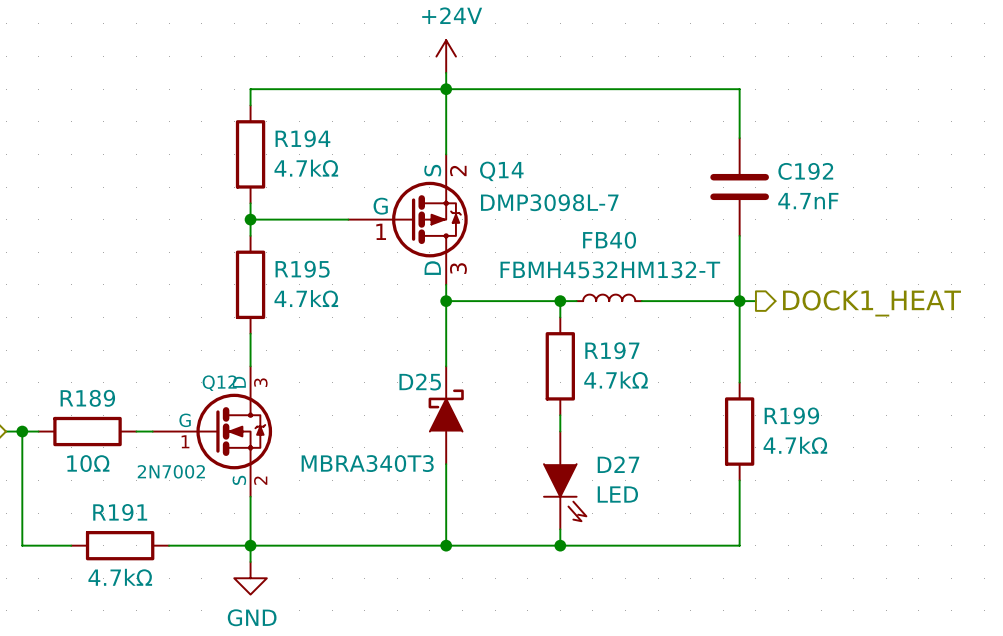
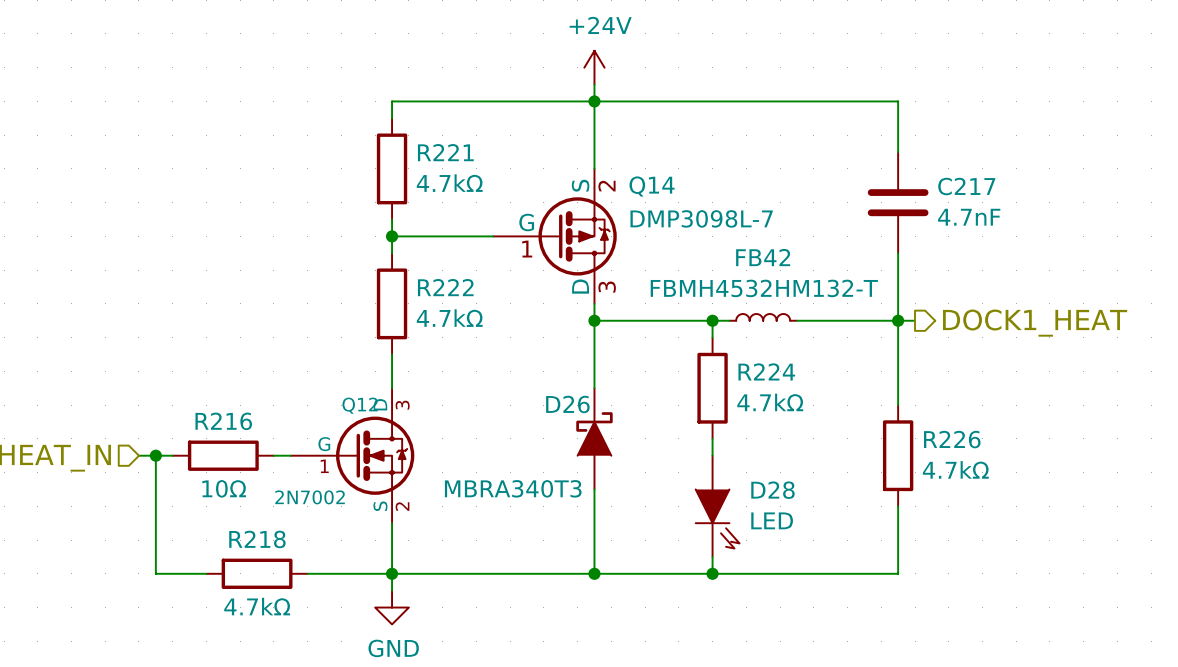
R194 name: R194 (302, 138) -> R221 (445, 152)
C192 name: C192 (805, 171) -> C217 (966, 186)
FB40 name: FB40 (609, 240) -> FB42 (763, 257)
R195 name: R195 (302, 269) -> R222 (445, 287)
R197 name: R197 (612, 350) -> R224 (766, 371)
D25 name: D25 (420, 382) -> D26 (567, 404)
R189 name: R189 (87, 398) -> R216 (223, 421)
R199 name: R199 (791, 415) -> R226 (952, 439)
D27 name: D27 (618, 464) -> D28 (772, 490)
R191 name: R191 (120, 512) -> R218 (257, 539)

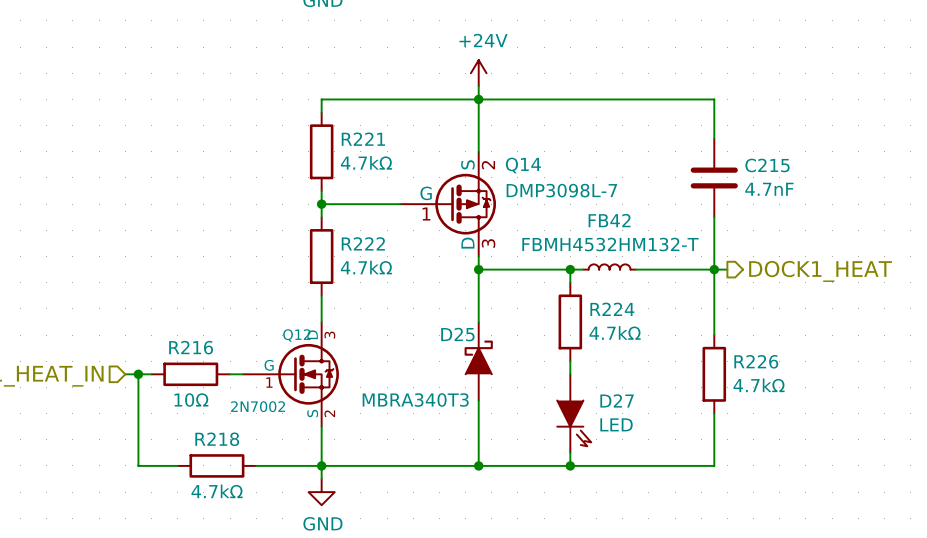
C217 name: C217 (966, 186) -> C215 (767, 165)
D26 name: D26 (567, 404) -> D25 (457, 334)
D28 name: D28 (772, 490) -> D27 (617, 400)

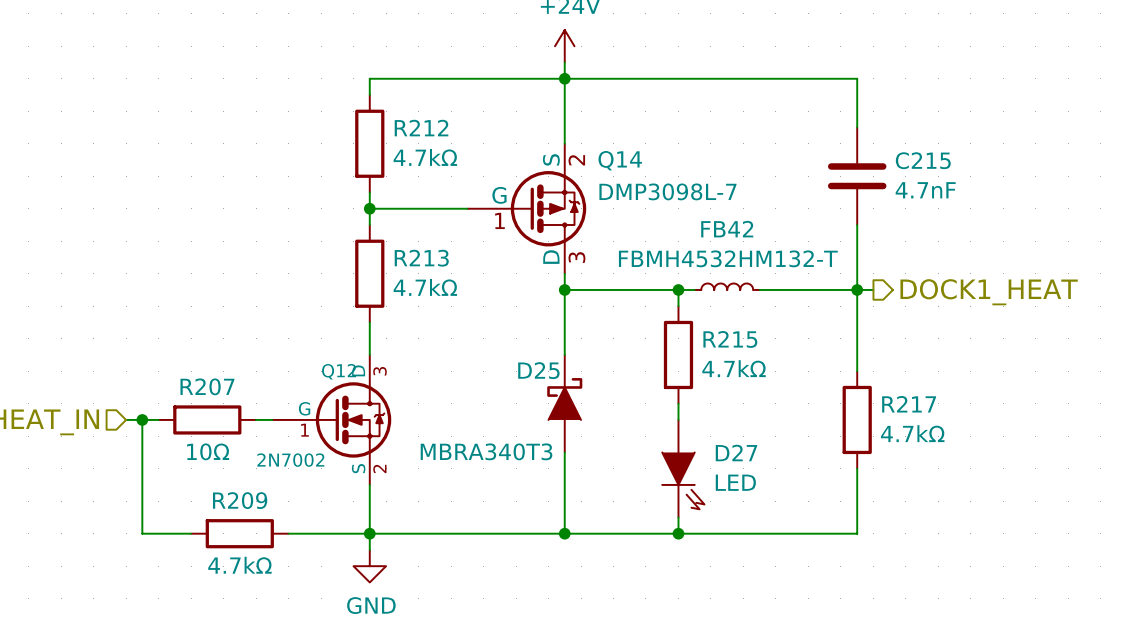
R221 name: R221 (363, 139) -> R212 (421, 128)
R222 name: R222 (363, 243) -> R213 (421, 258)
R224 name: R224 (612, 309) -> R215 (730, 339)
R216 name: R216 (191, 347) -> R207 (207, 386)
R226 name: R226 (756, 361) -> R217 (909, 404)
R218 name: R218 (217, 439) -> R209 (240, 500)

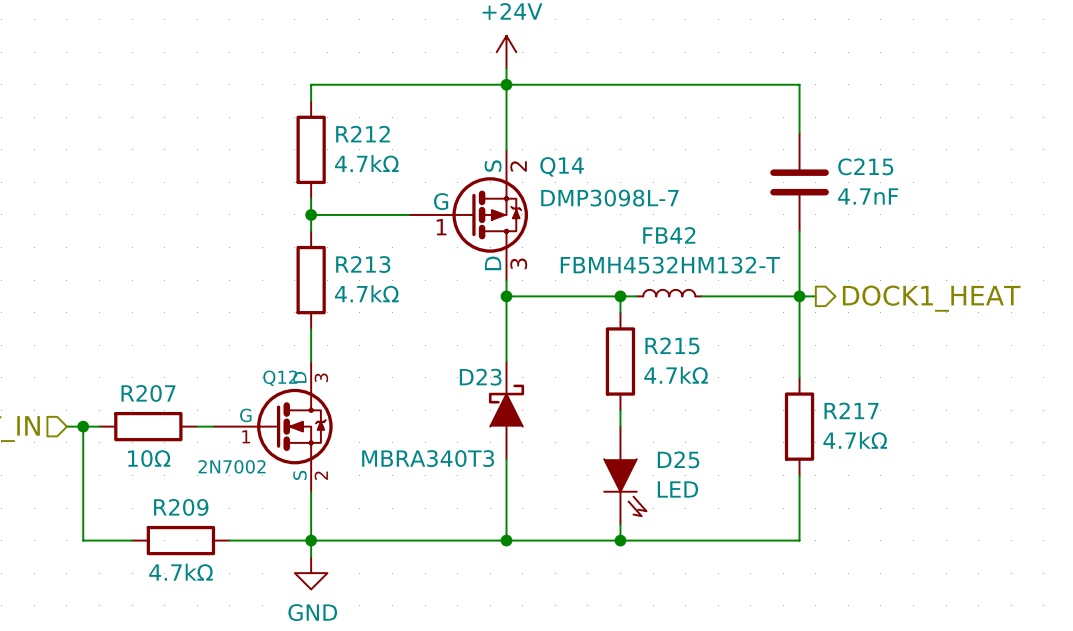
D25 name: D25 (538, 370) -> D23 (480, 377)
D27 name: D27 (736, 453) -> D25 (678, 459)

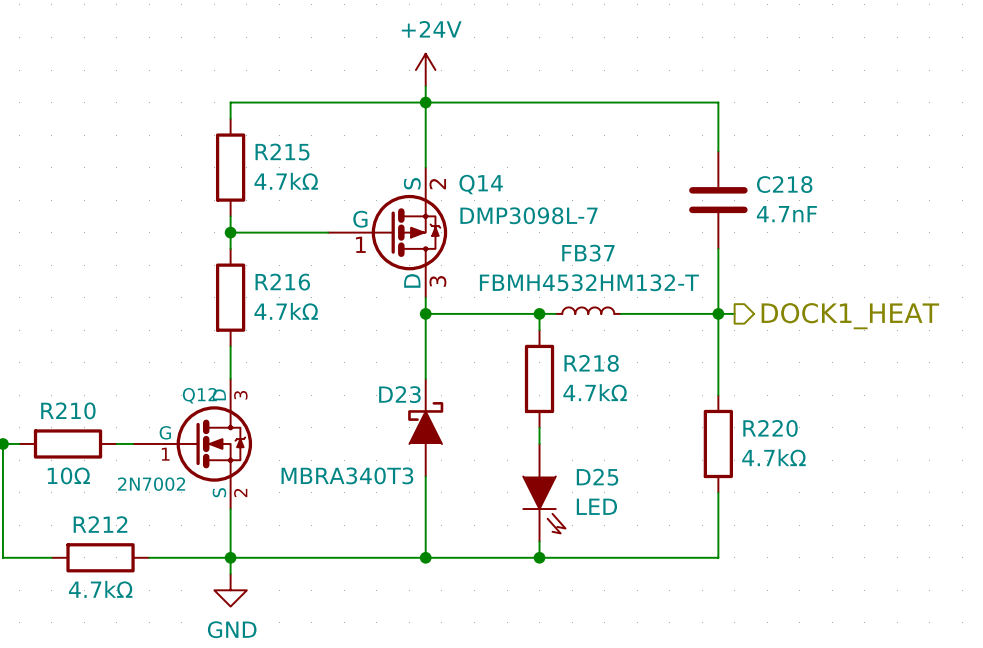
R212 name: R212 (362, 134) -> R215 (282, 152)
C215 name: C215 (865, 166) -> C218 (784, 184)
FB42 name: FB42 (669, 235) -> FB37 (588, 253)
R213 name: R213 (363, 264) -> R216 (282, 282)
R215 name: R215 (672, 345) -> R218 (591, 363)
R207 name: R207 (148, 393) -> R210 (68, 410)
R217 name: R217 (851, 410) -> R220 (770, 428)
R209 name: R209 (181, 507) -> R212 (100, 524)

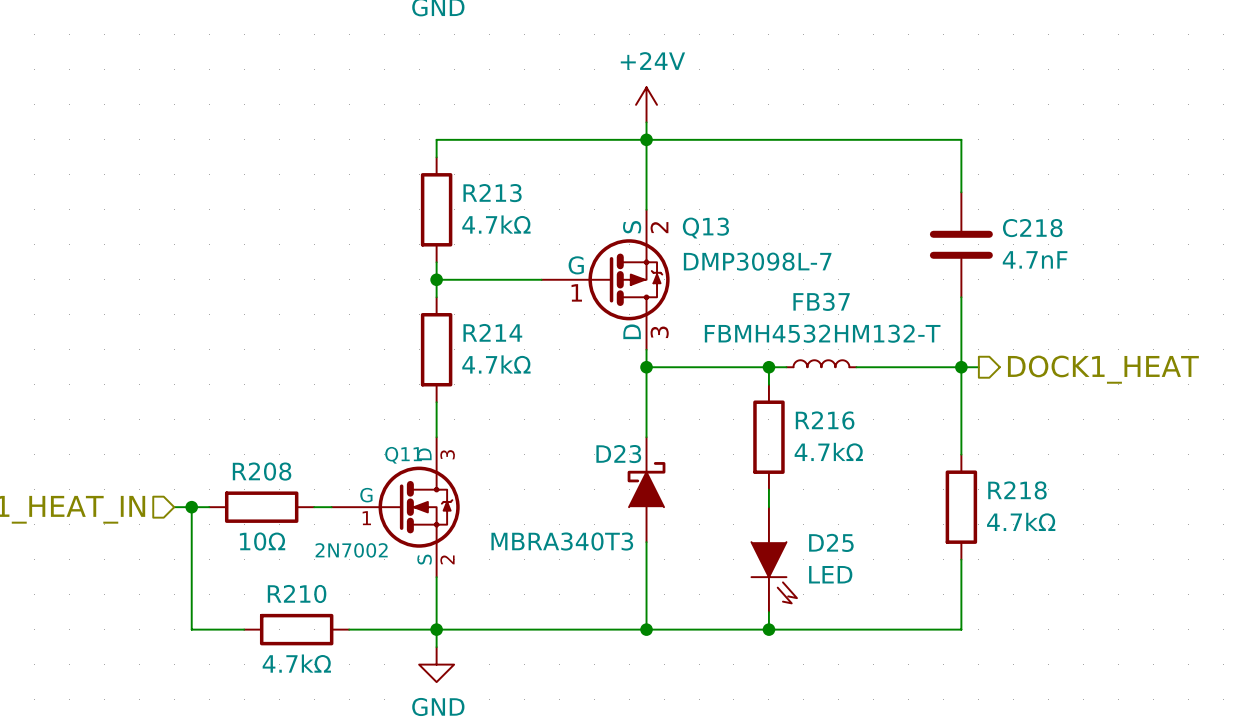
R215 name: R215 (282, 152) -> R213 (492, 193)
Q14 name: Q14 (481, 184) -> Q13 (705, 228)
R216 name: R216 (282, 282) -> R214 (492, 332)
R218 name: R218 (591, 363) -> R216 (825, 420)
Q12 name: Q12 (199, 395) -> Q11 (403, 455)
R210 name: R210 (68, 410) -> R208 (262, 471)
R220 name: R220 (770, 428) -> R218 (1017, 490)
R212 name: R212 (100, 524) -> R210 (297, 593)

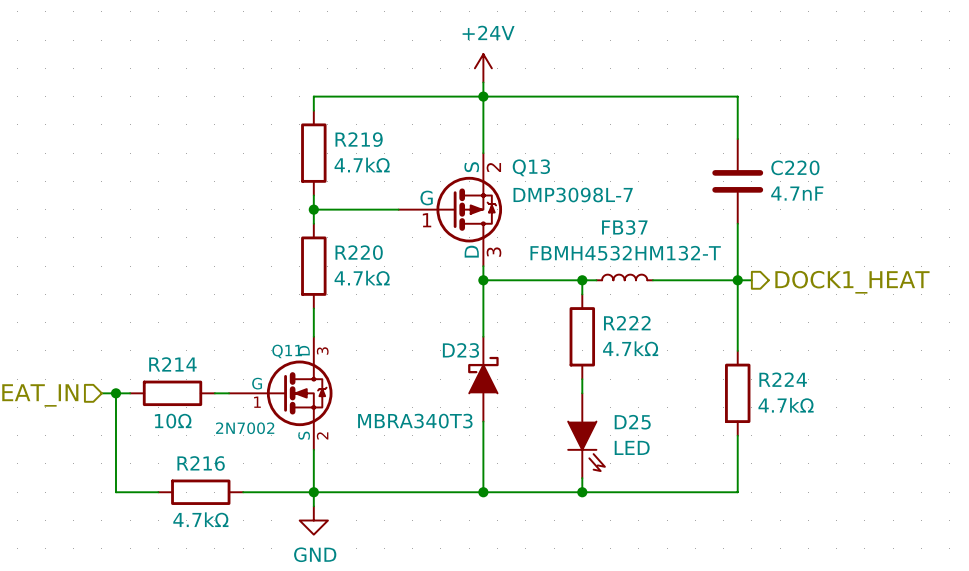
R213 name: R213 (492, 193) -> R219 (359, 139)
C218 name: C218 (1032, 228) -> C220 (795, 167)
R214 name: R214 (492, 332) -> R220 (359, 252)
R216 name: R216 (825, 420) -> R222 (627, 323)
R208 name: R208 (262, 471) -> R214 (172, 364)
R218 name: R218 (1017, 490) -> R224 (783, 379)
R210 name: R210 (297, 593) -> R216 (201, 463)

